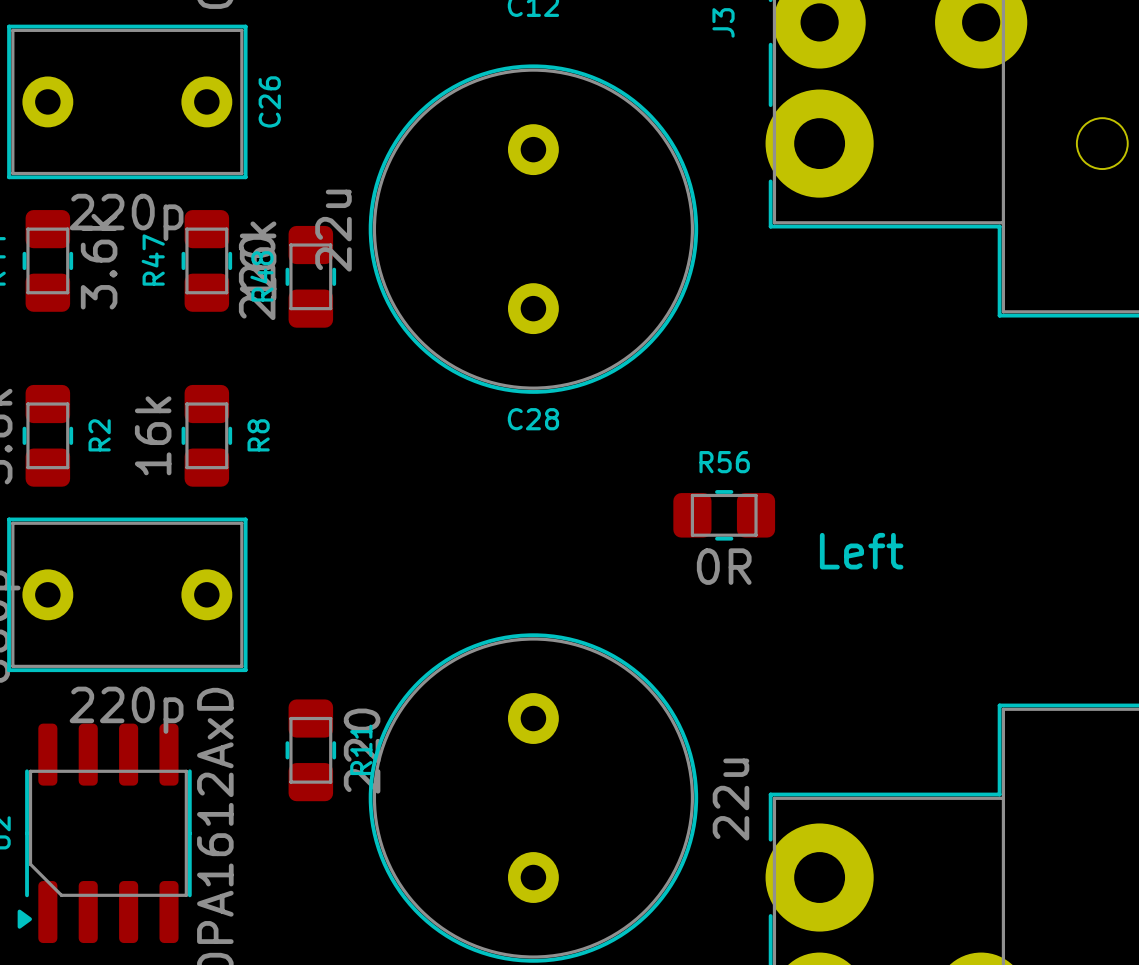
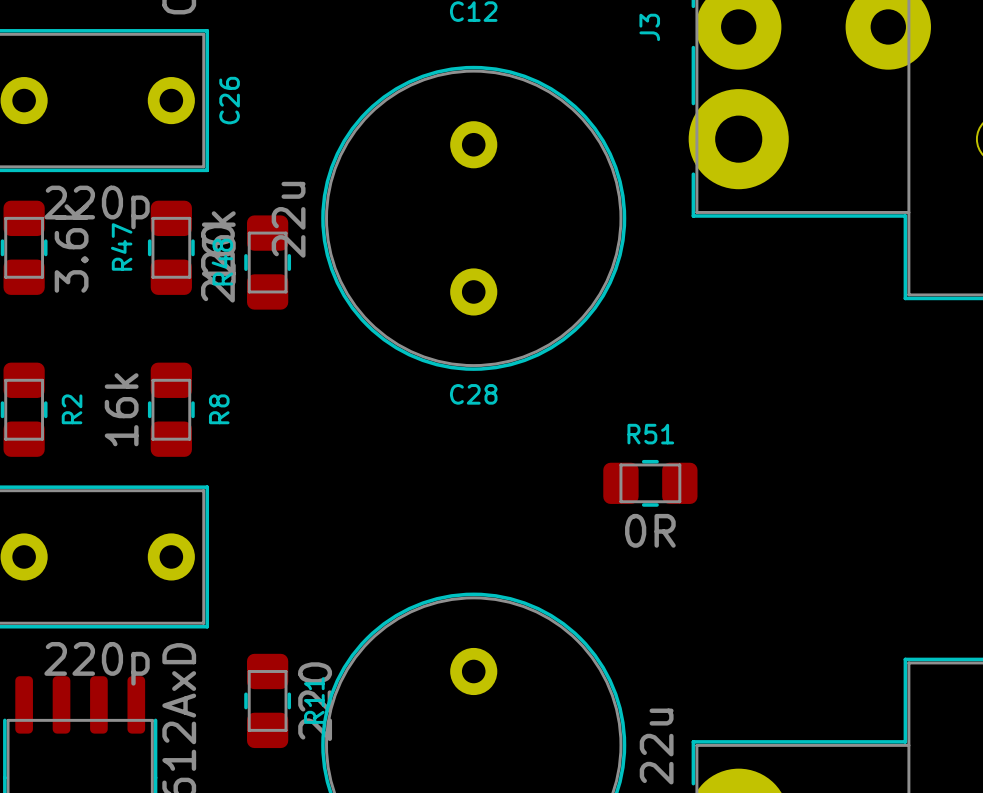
R56 name: R56 (724, 462) -> R51 (650, 434)
text: Left (861, 551) -> none

